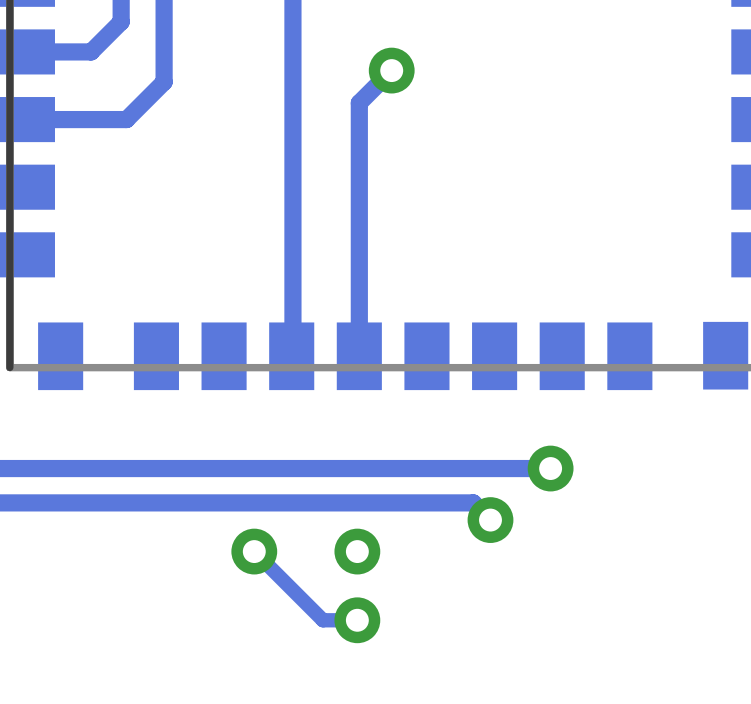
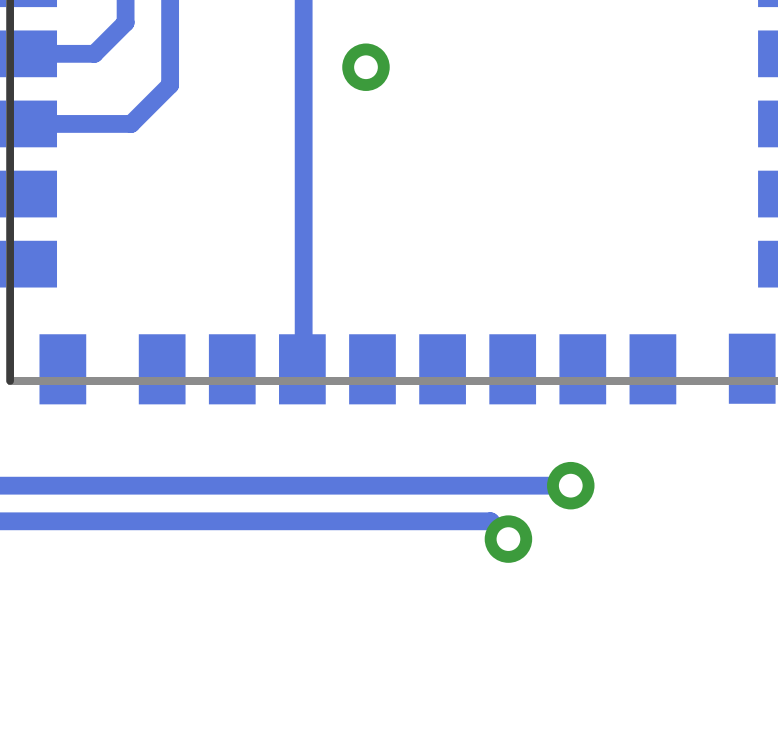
track: (391, 70) (359, 102) (359, 356) -> none
via position: (391, 70) -> (365, 67)
track: (254, 551) (323, 620) (357, 620) -> none
via: (254, 551) -> none
via: (357, 551) -> none
via: (357, 620) -> none

